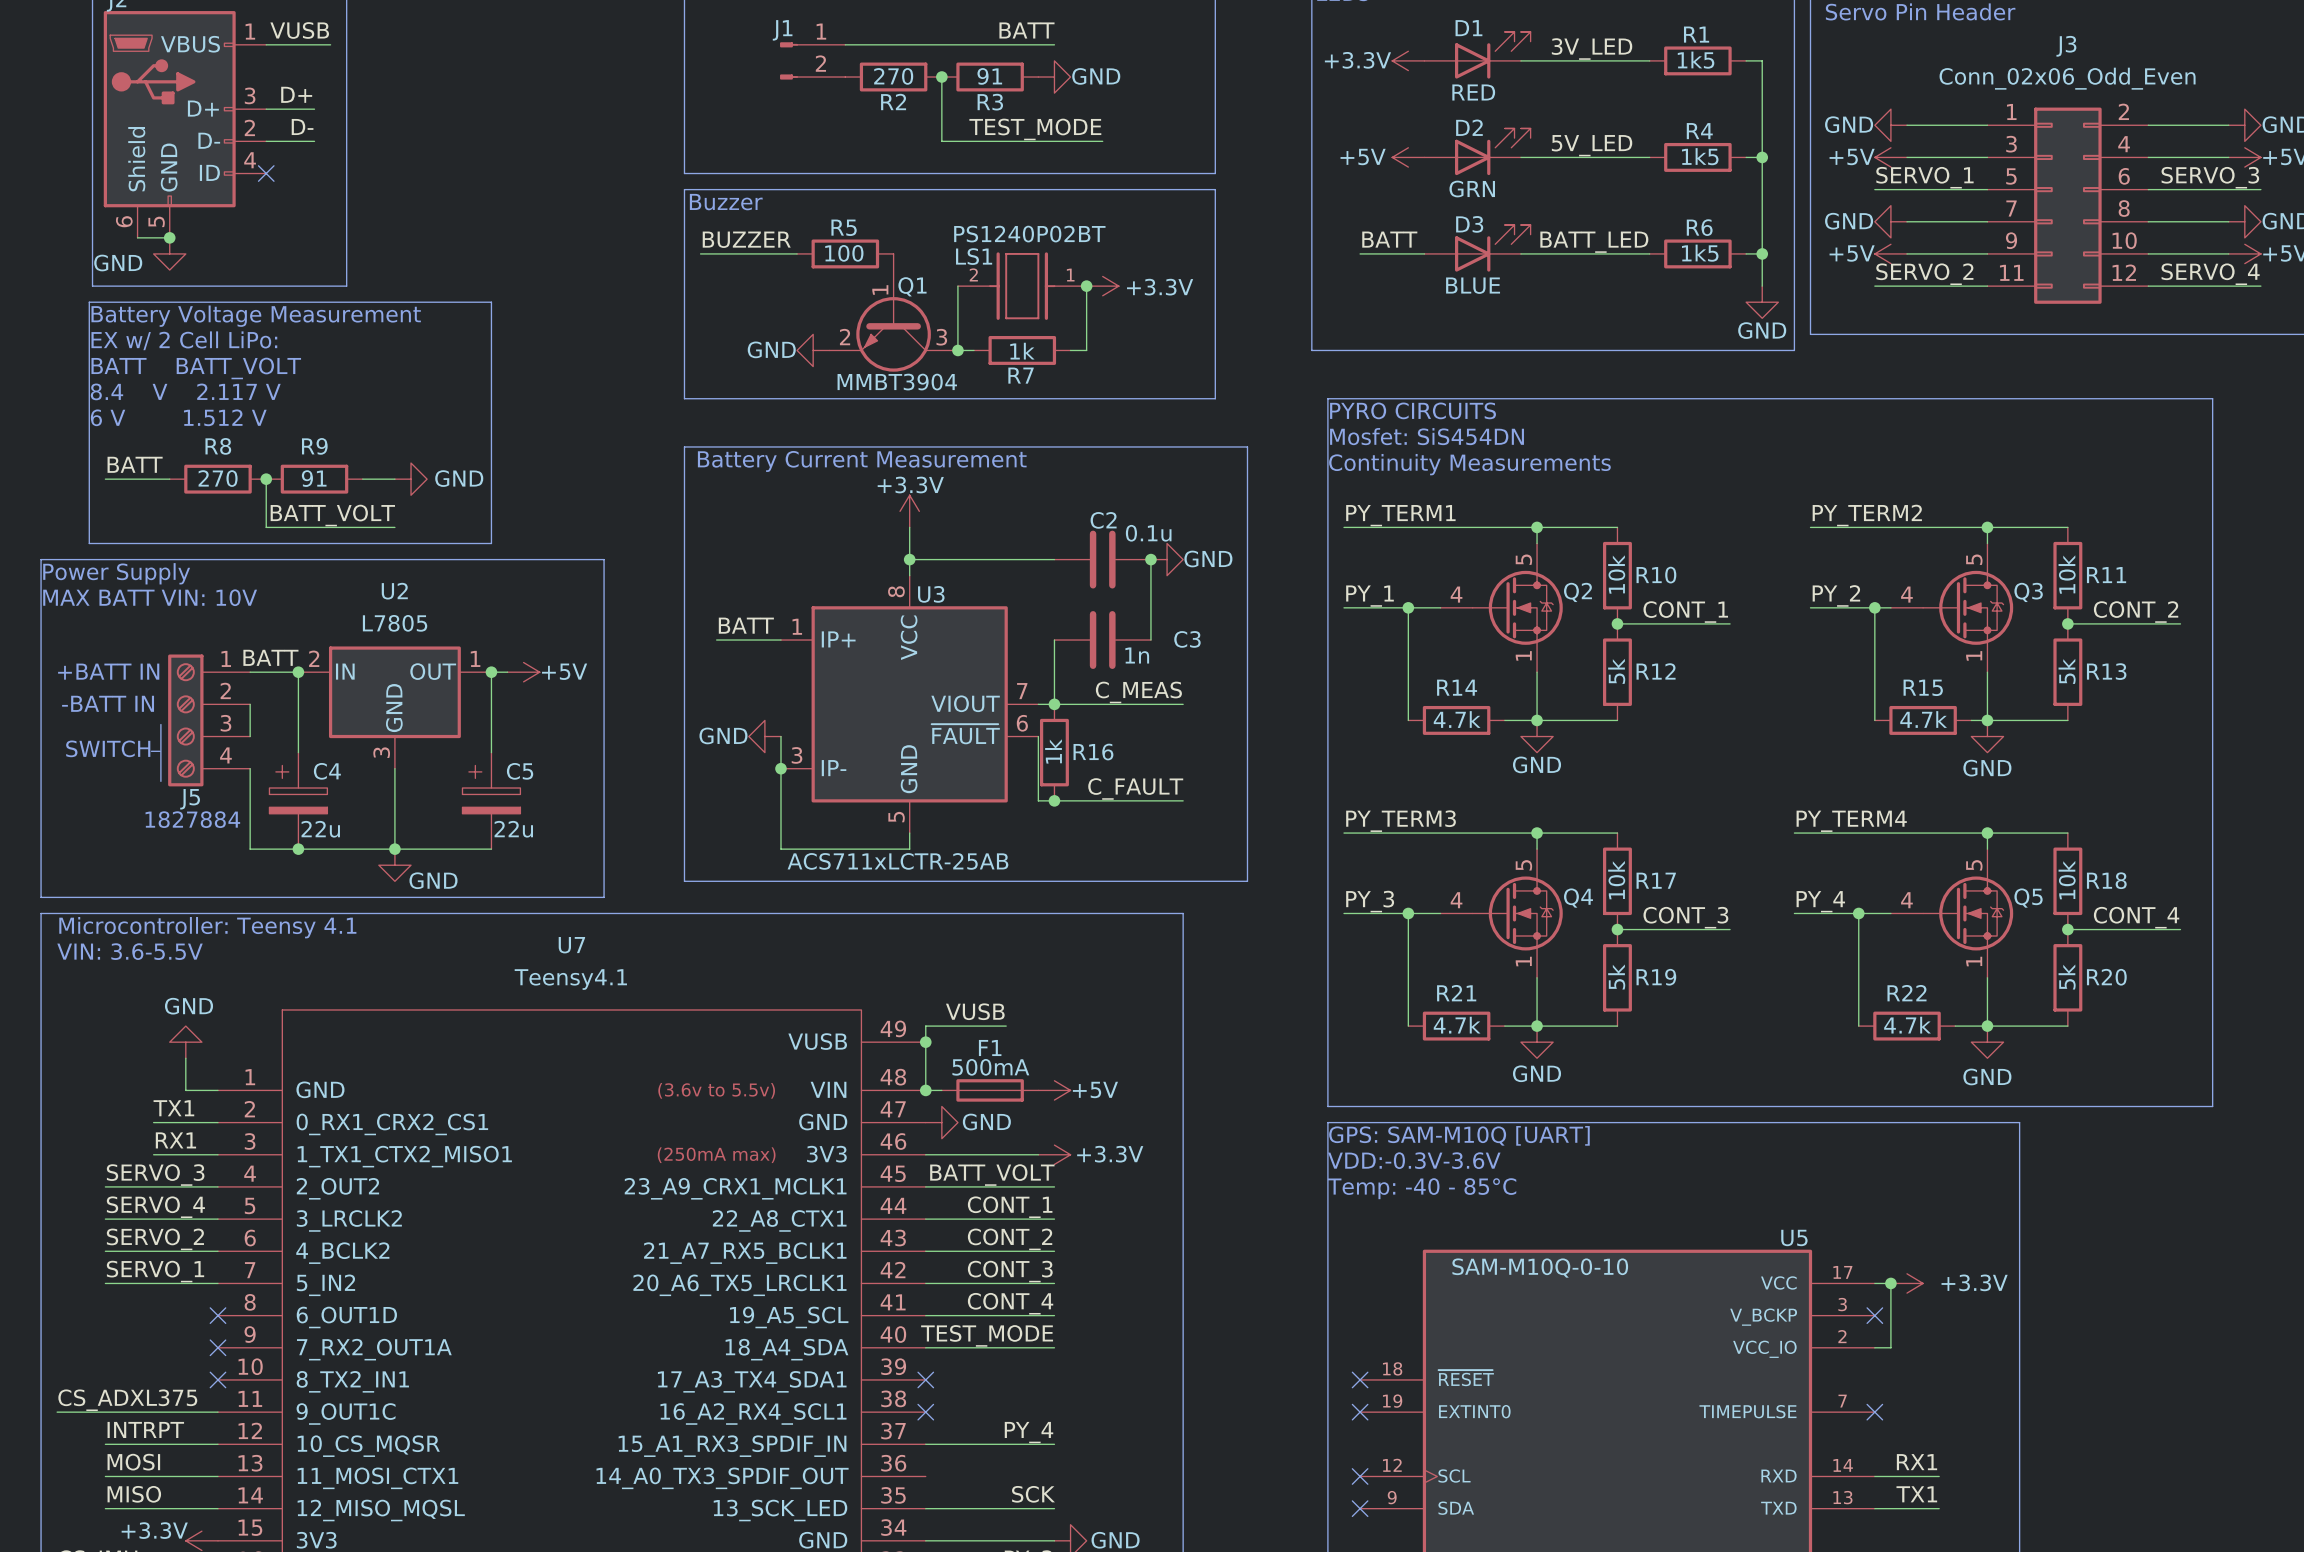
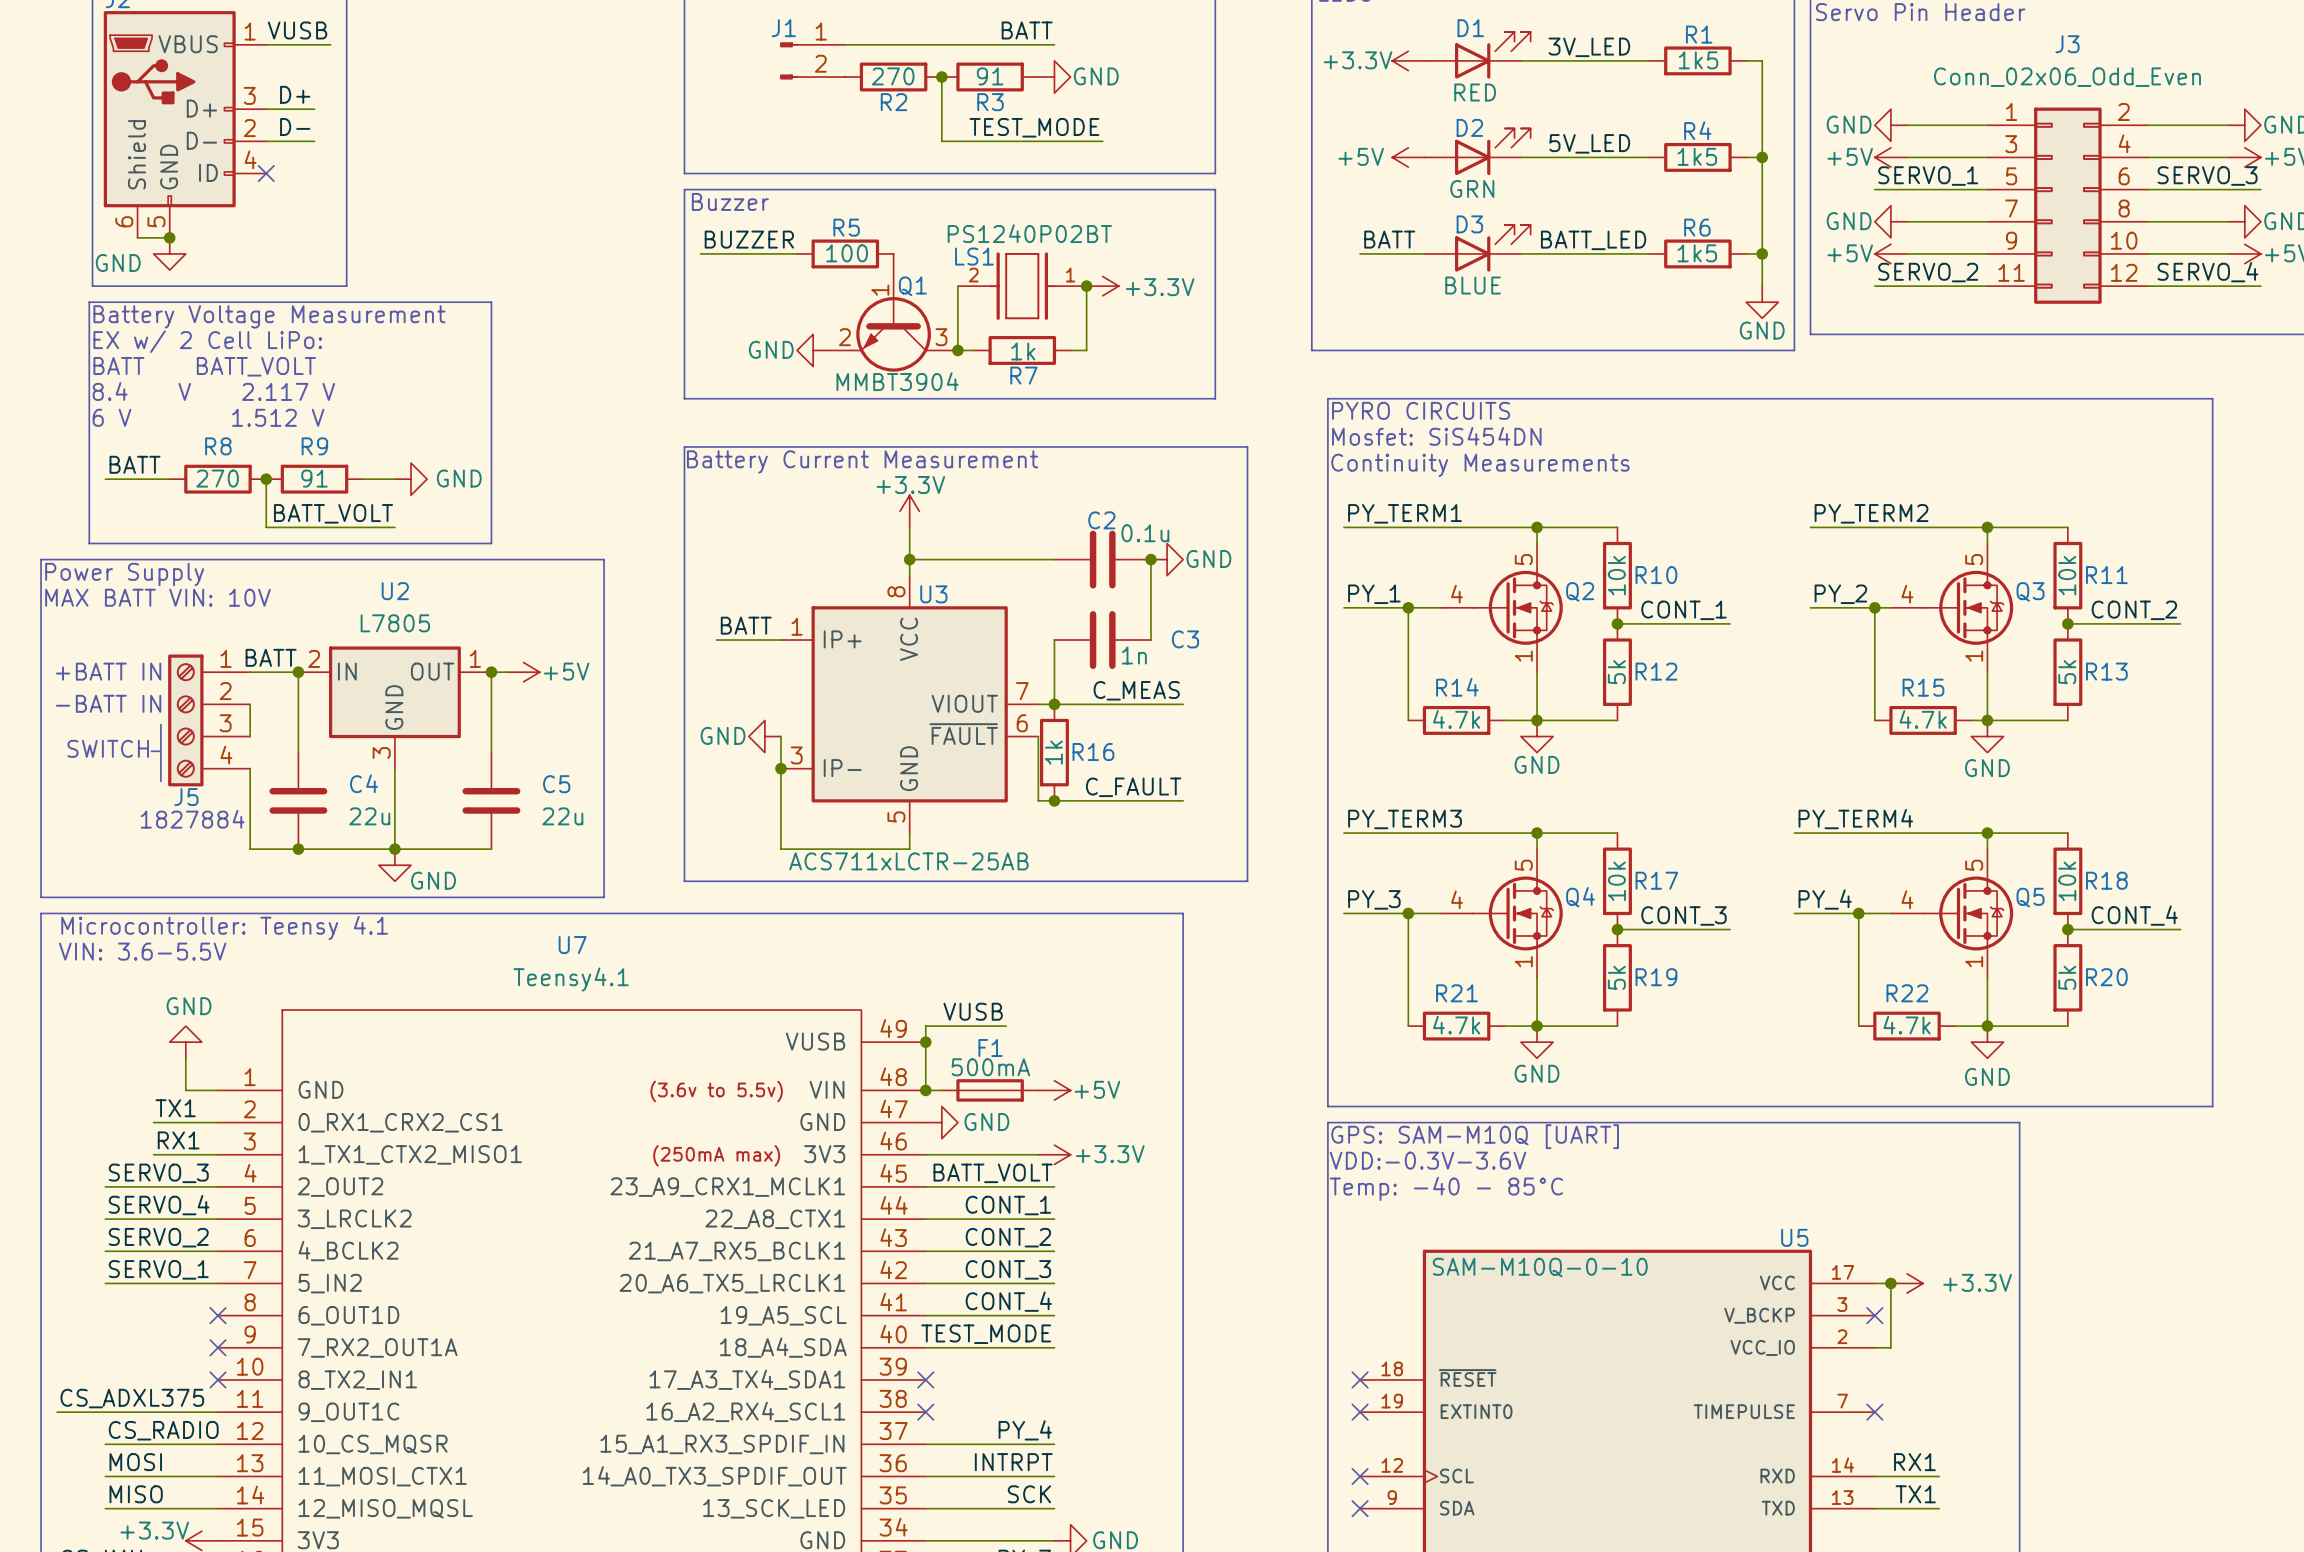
C4 symbol: [269, 752, 328, 850] -> [269, 752, 328, 850]
C5 symbol: [462, 752, 521, 850] -> [462, 752, 521, 850]
C4 name position: C4 (327, 771) -> C4 (364, 783)
C5 name position: C5 (520, 771) -> C5 (556, 784)
C4 value position: 22u (320, 829) -> 22u (369, 816)
C5 value position: 22u (513, 829) -> 22u (562, 816)
label: INTRPT (145, 1429) -> CS_RADIO (163, 1430)
label: none -> INTRPT (1013, 1462)
wire: none -> (925, 1476) (1054, 1476)

